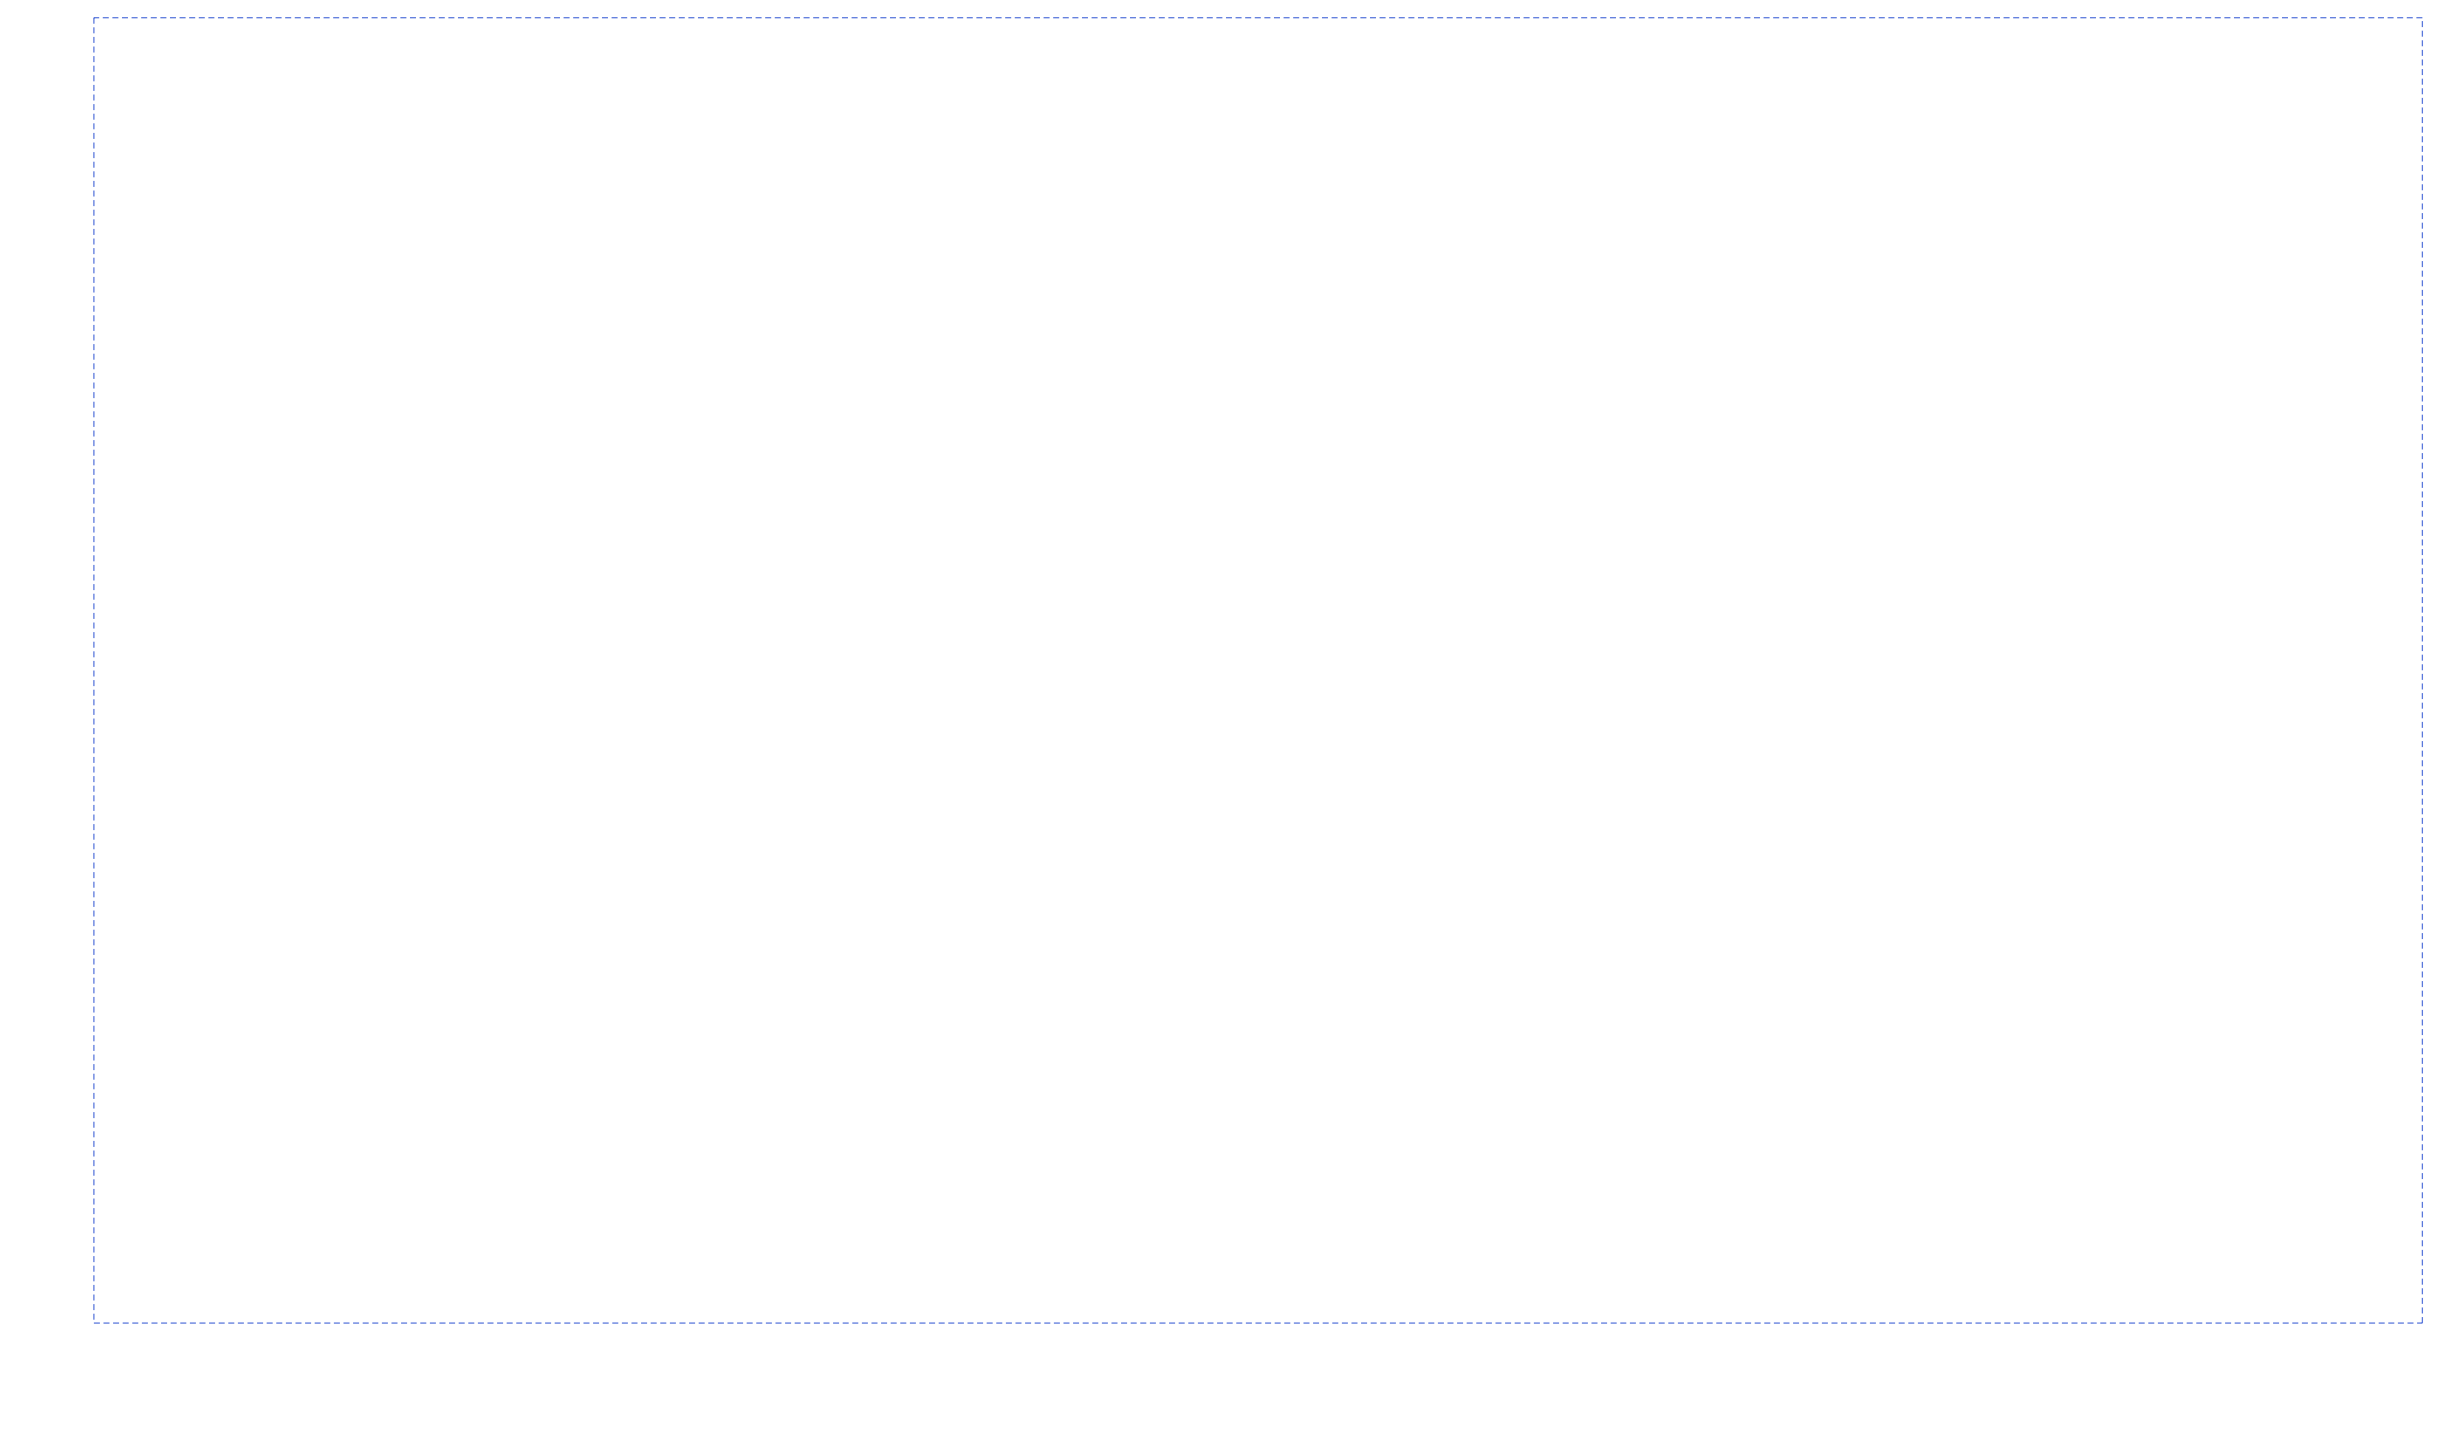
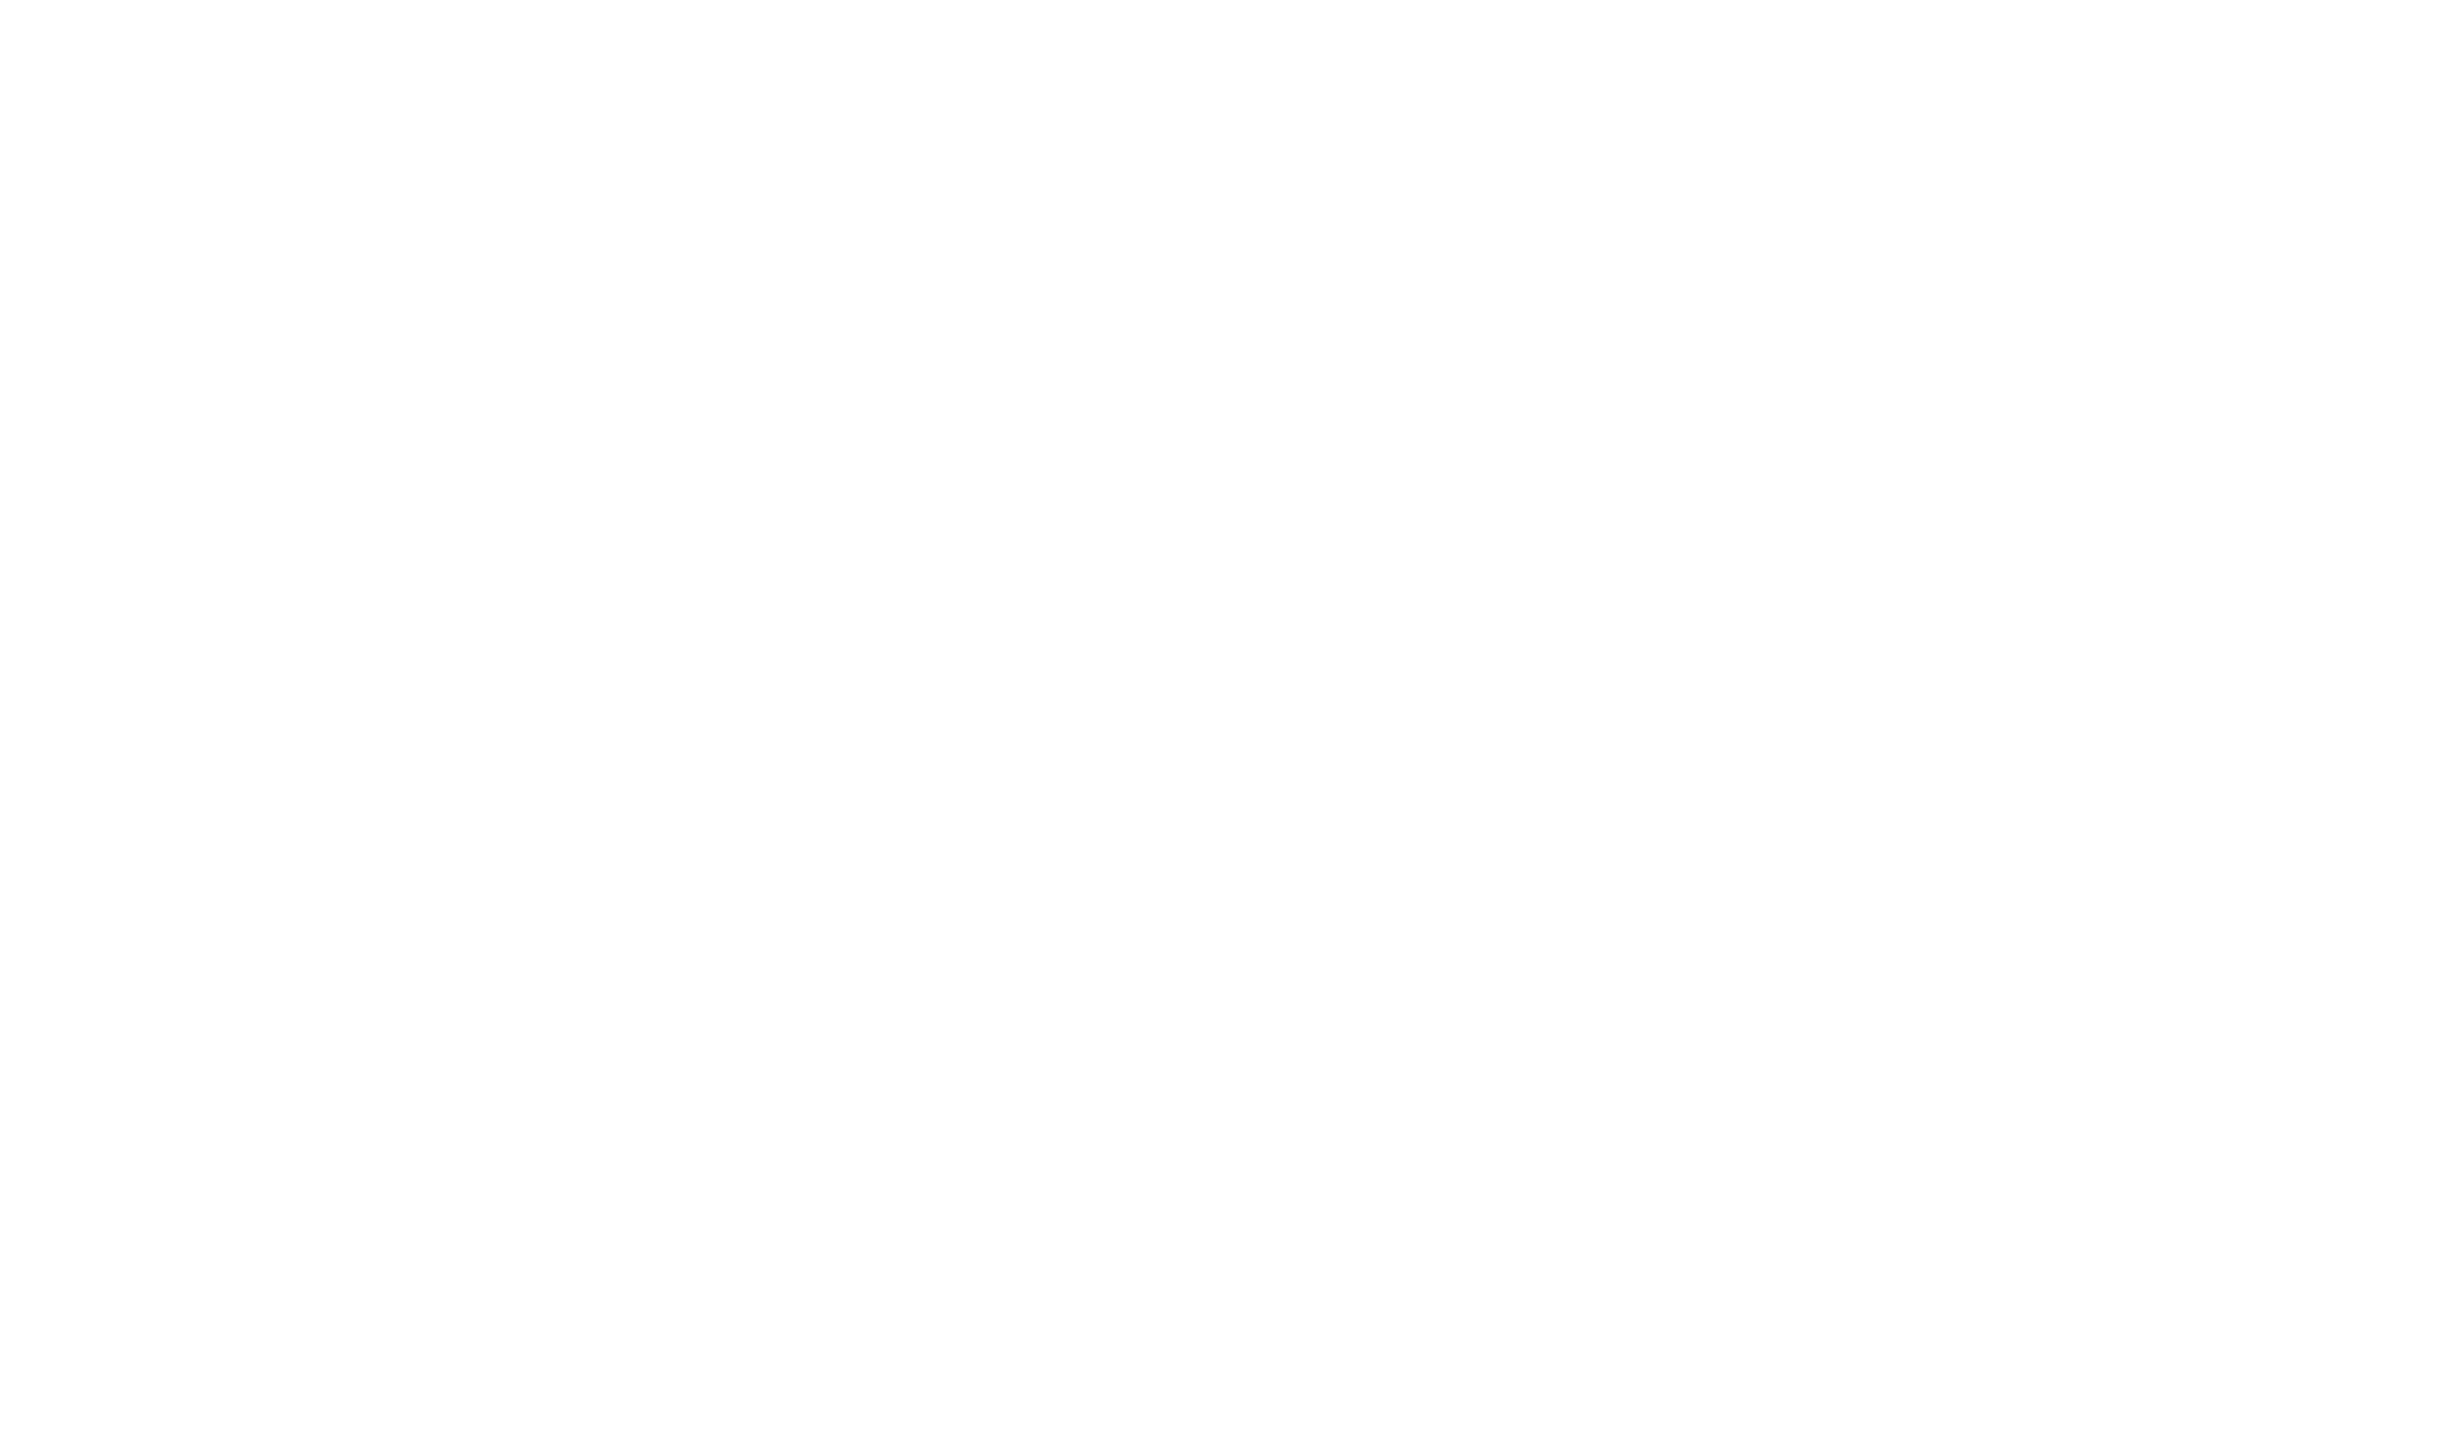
zone outline: (2422, 17) (2422, 1323) (93, 1323) (93, 17) (2422, 17) -> none

